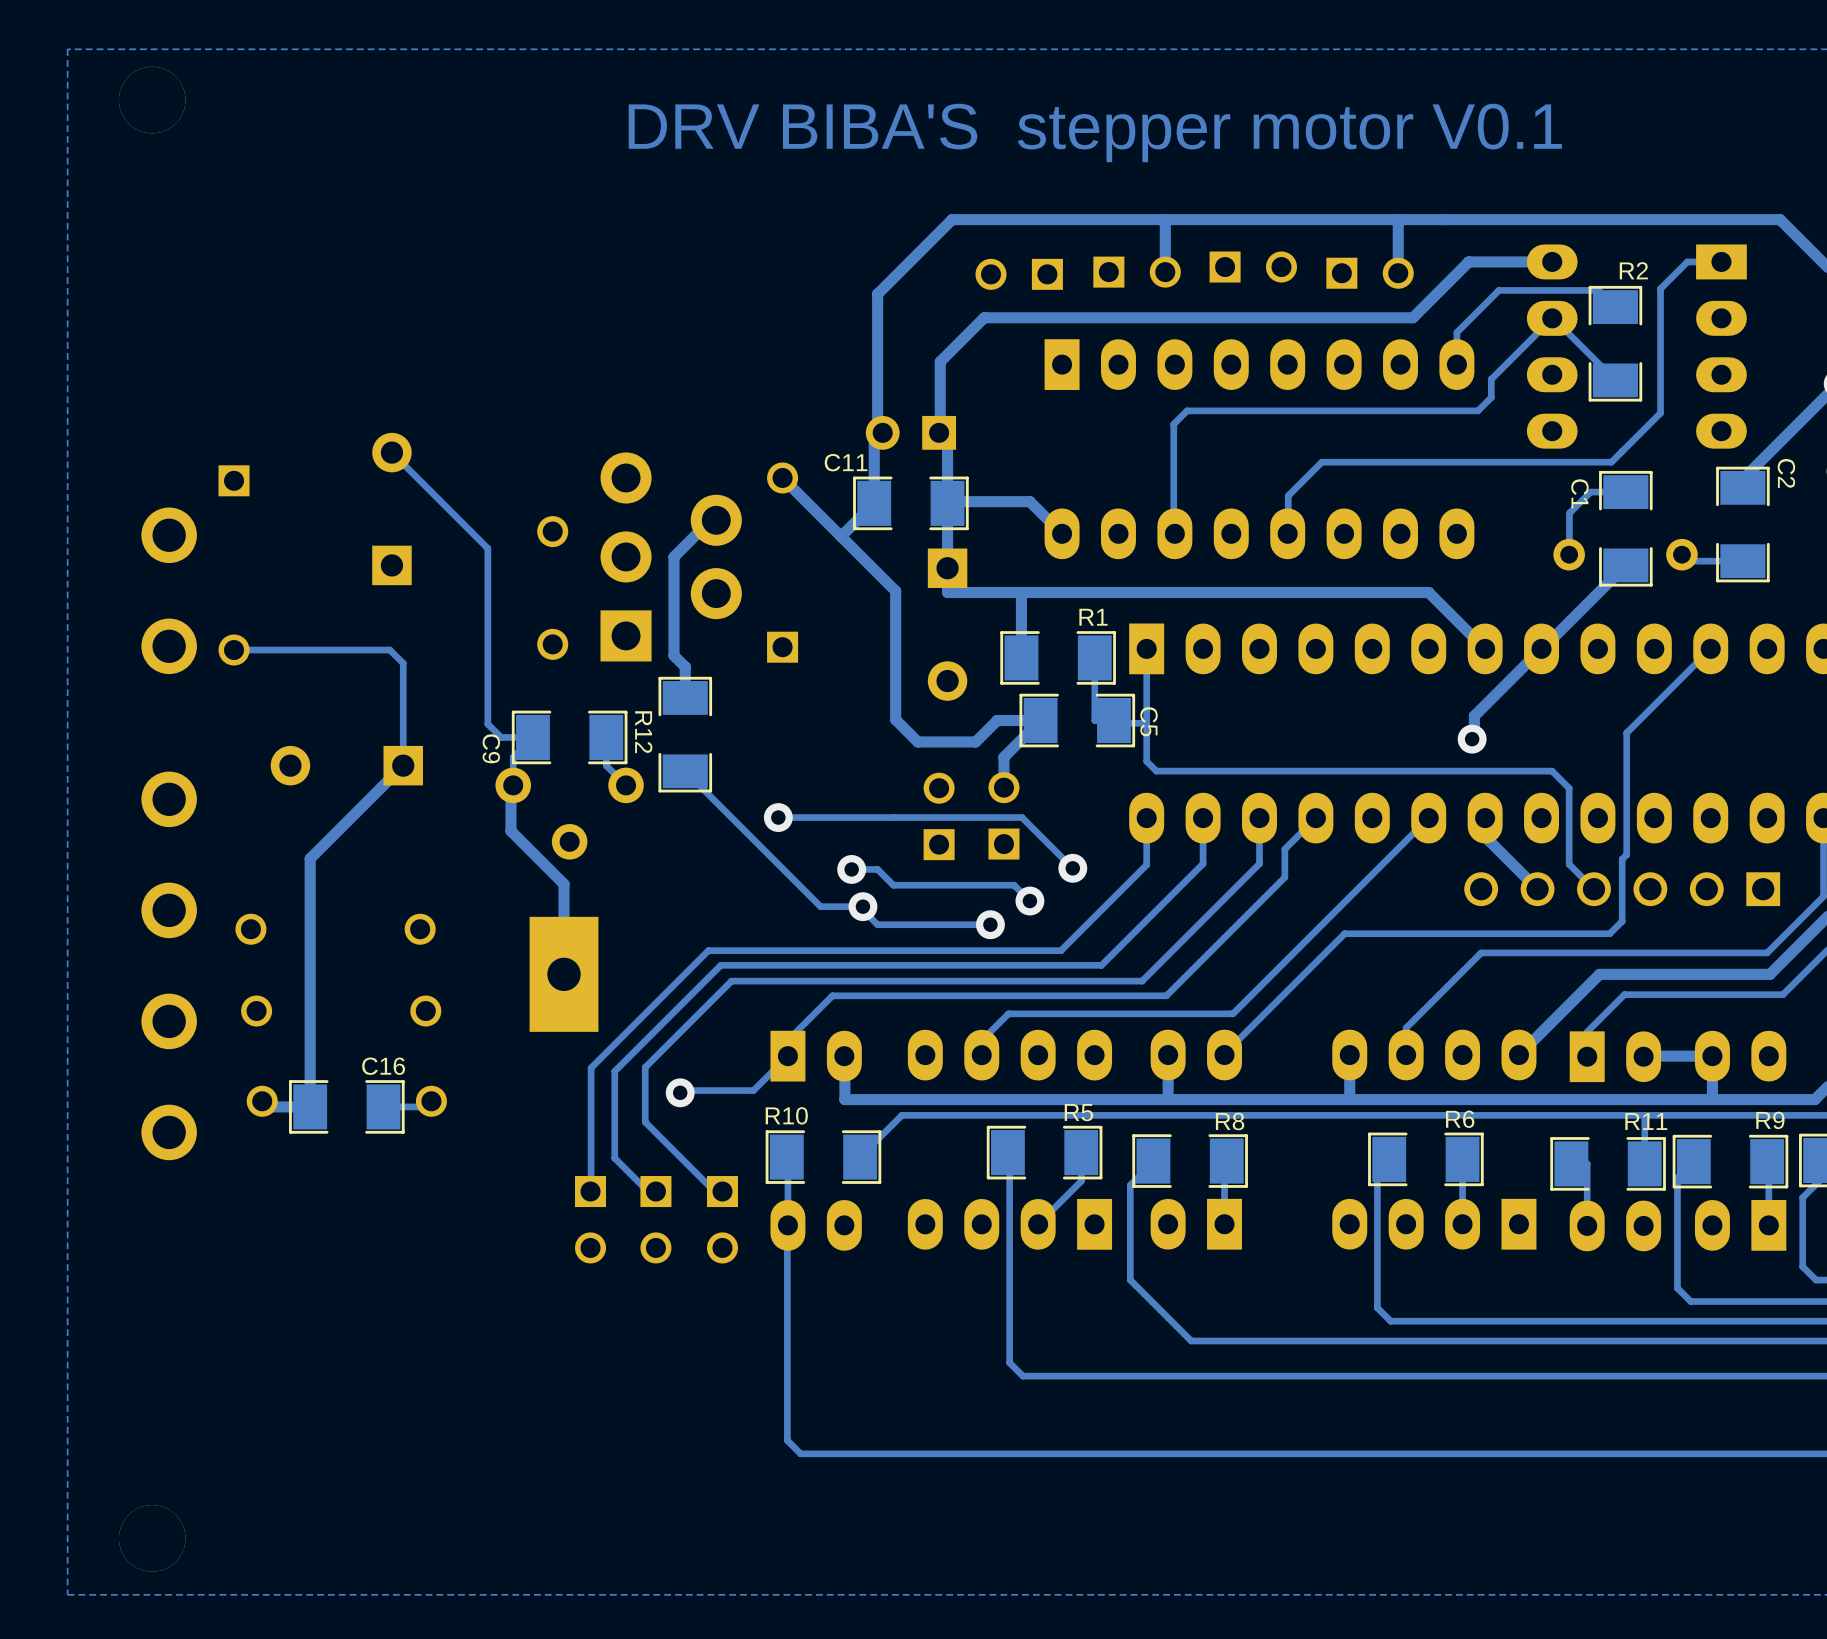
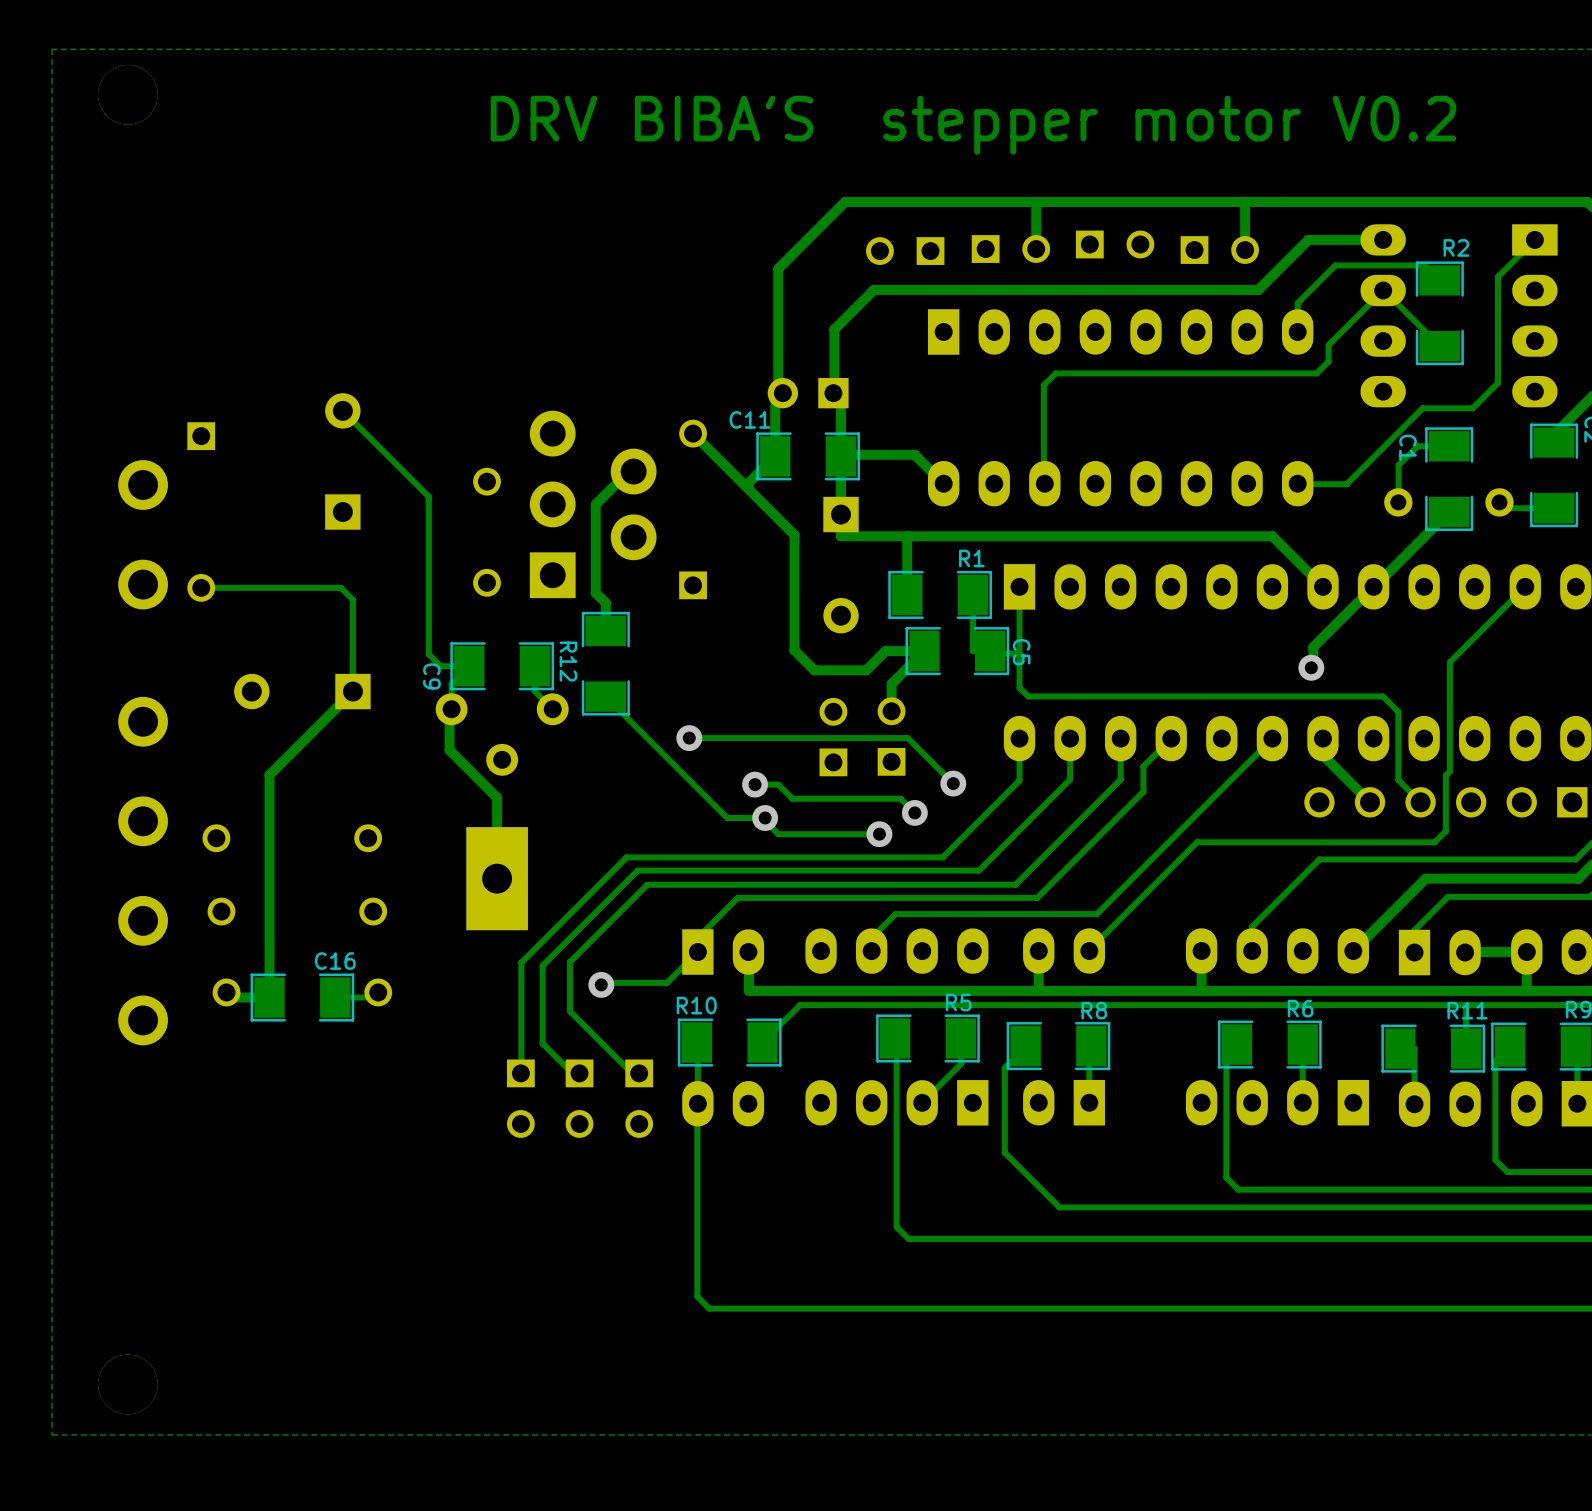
text: DRV BIBA'S stepper motor V0.1 (1095, 132) -> DRV BIBA'S stepper motor V0.2 (973, 125)
track: (1721, 261) (1687, 261) (1660, 288) (1660, 413) (1611, 462) (1321, 462) (1288, 495) (1287, 533) -> (1534, 239) (1497, 276) (1497, 383) (1472, 408) (1422, 408) (1346, 484) (1297, 483)

